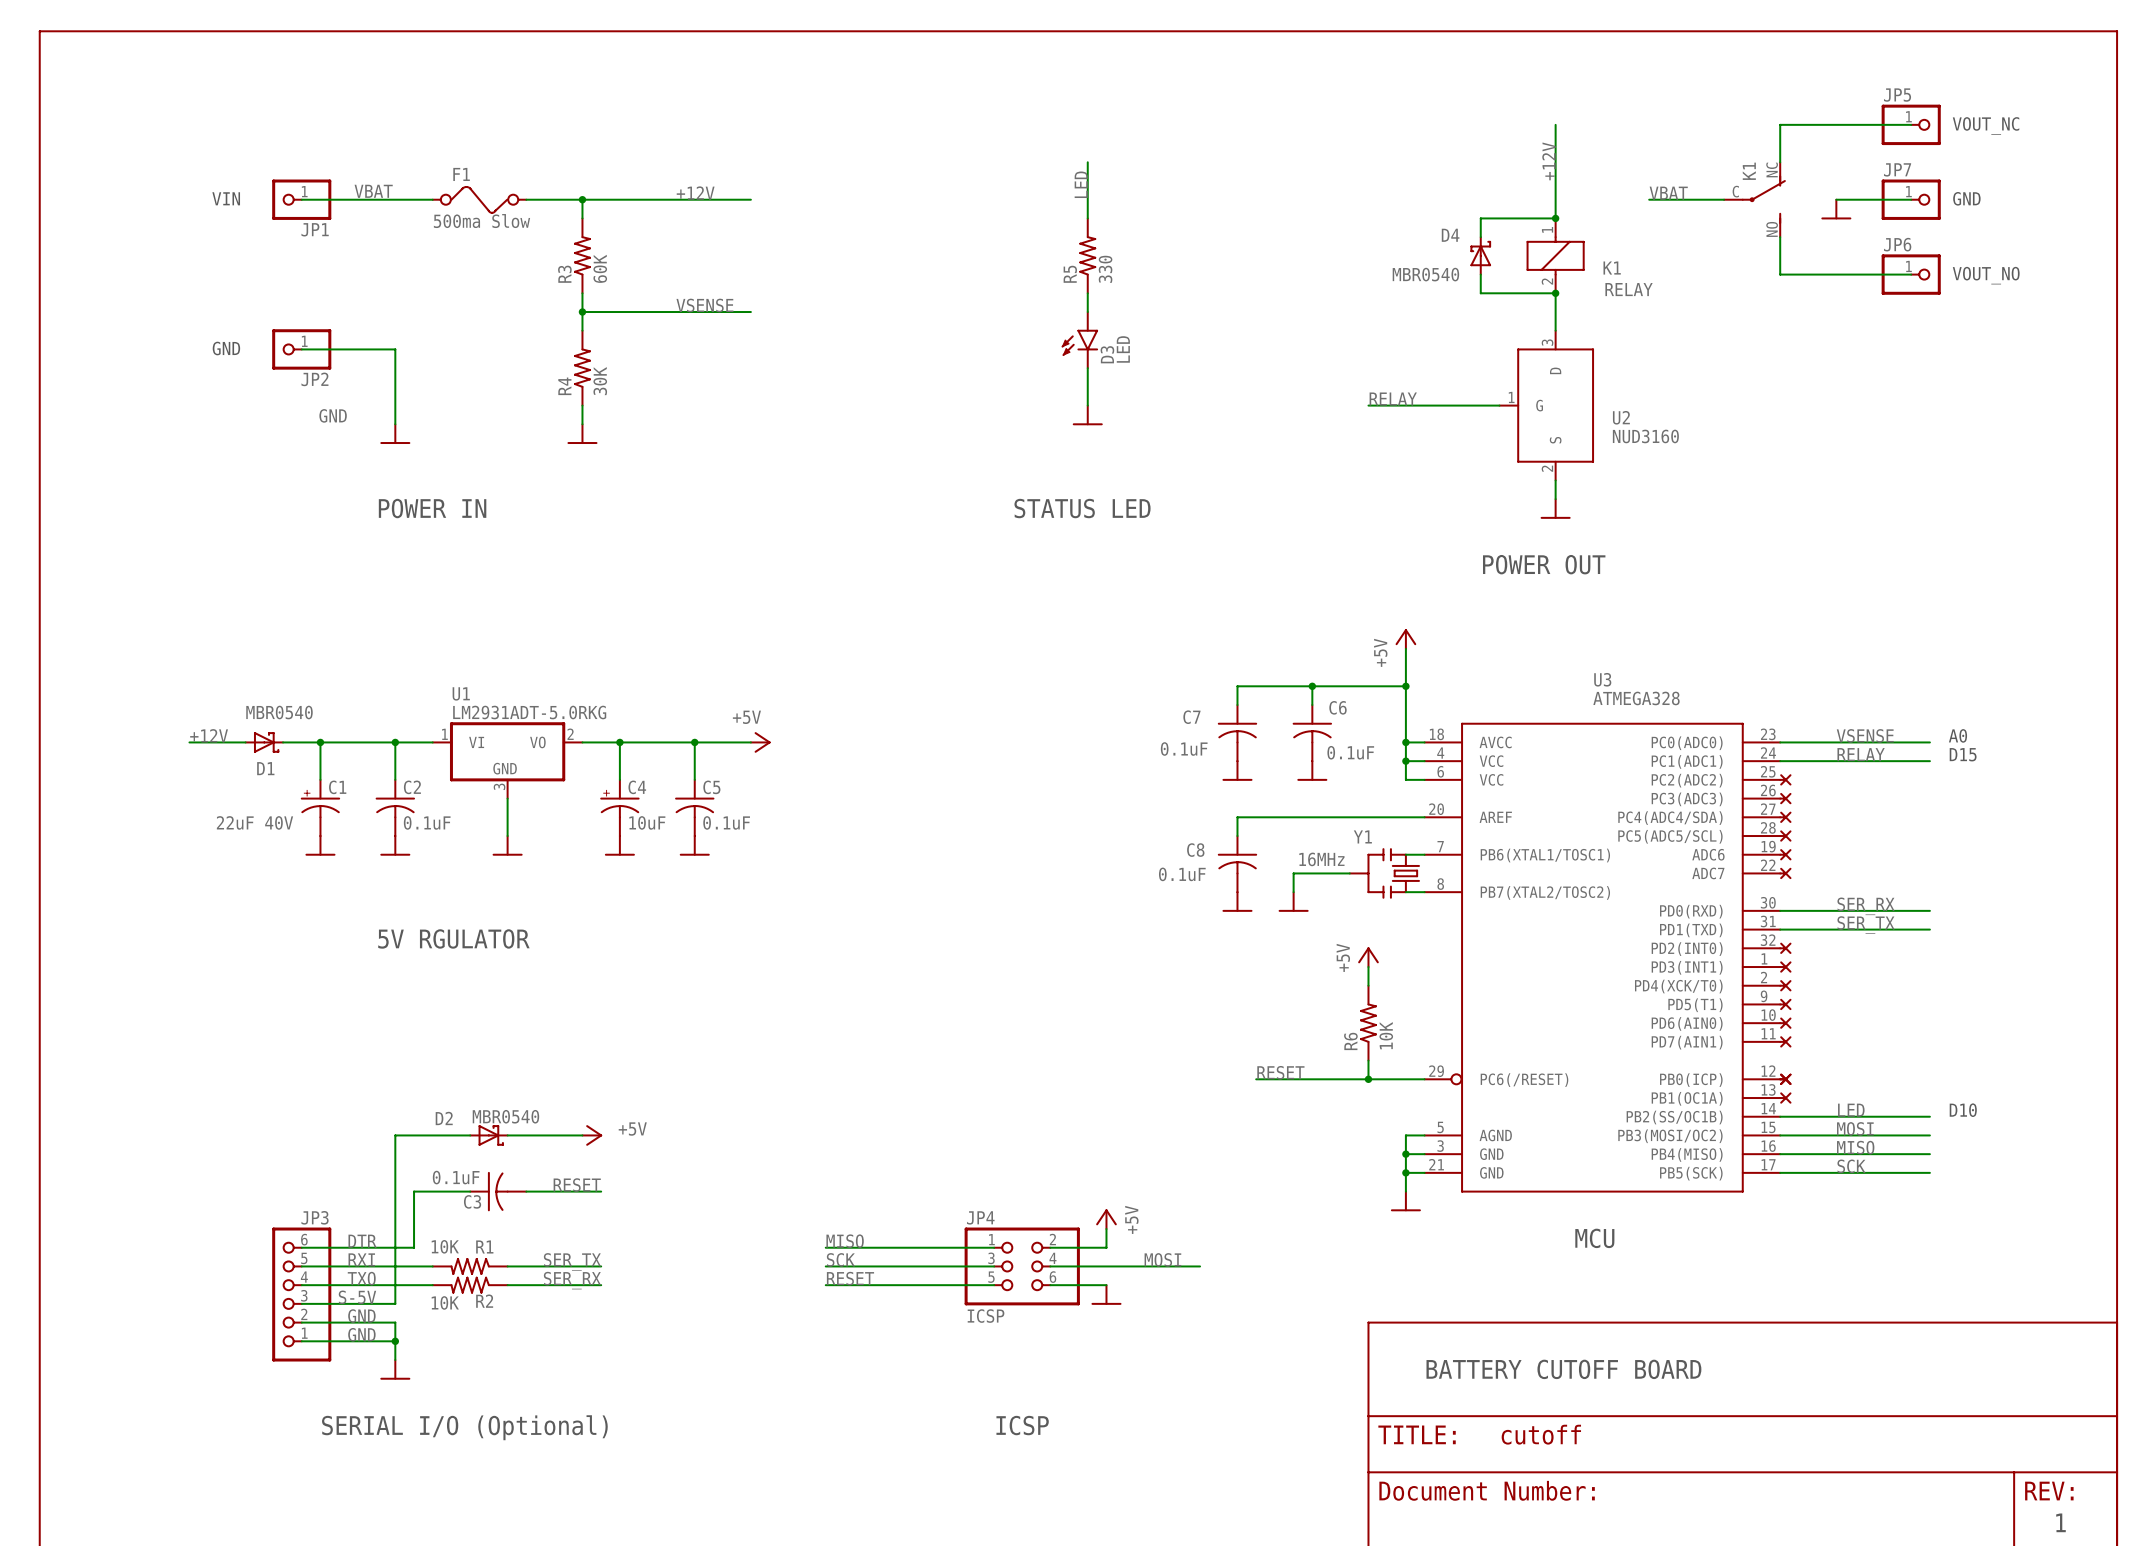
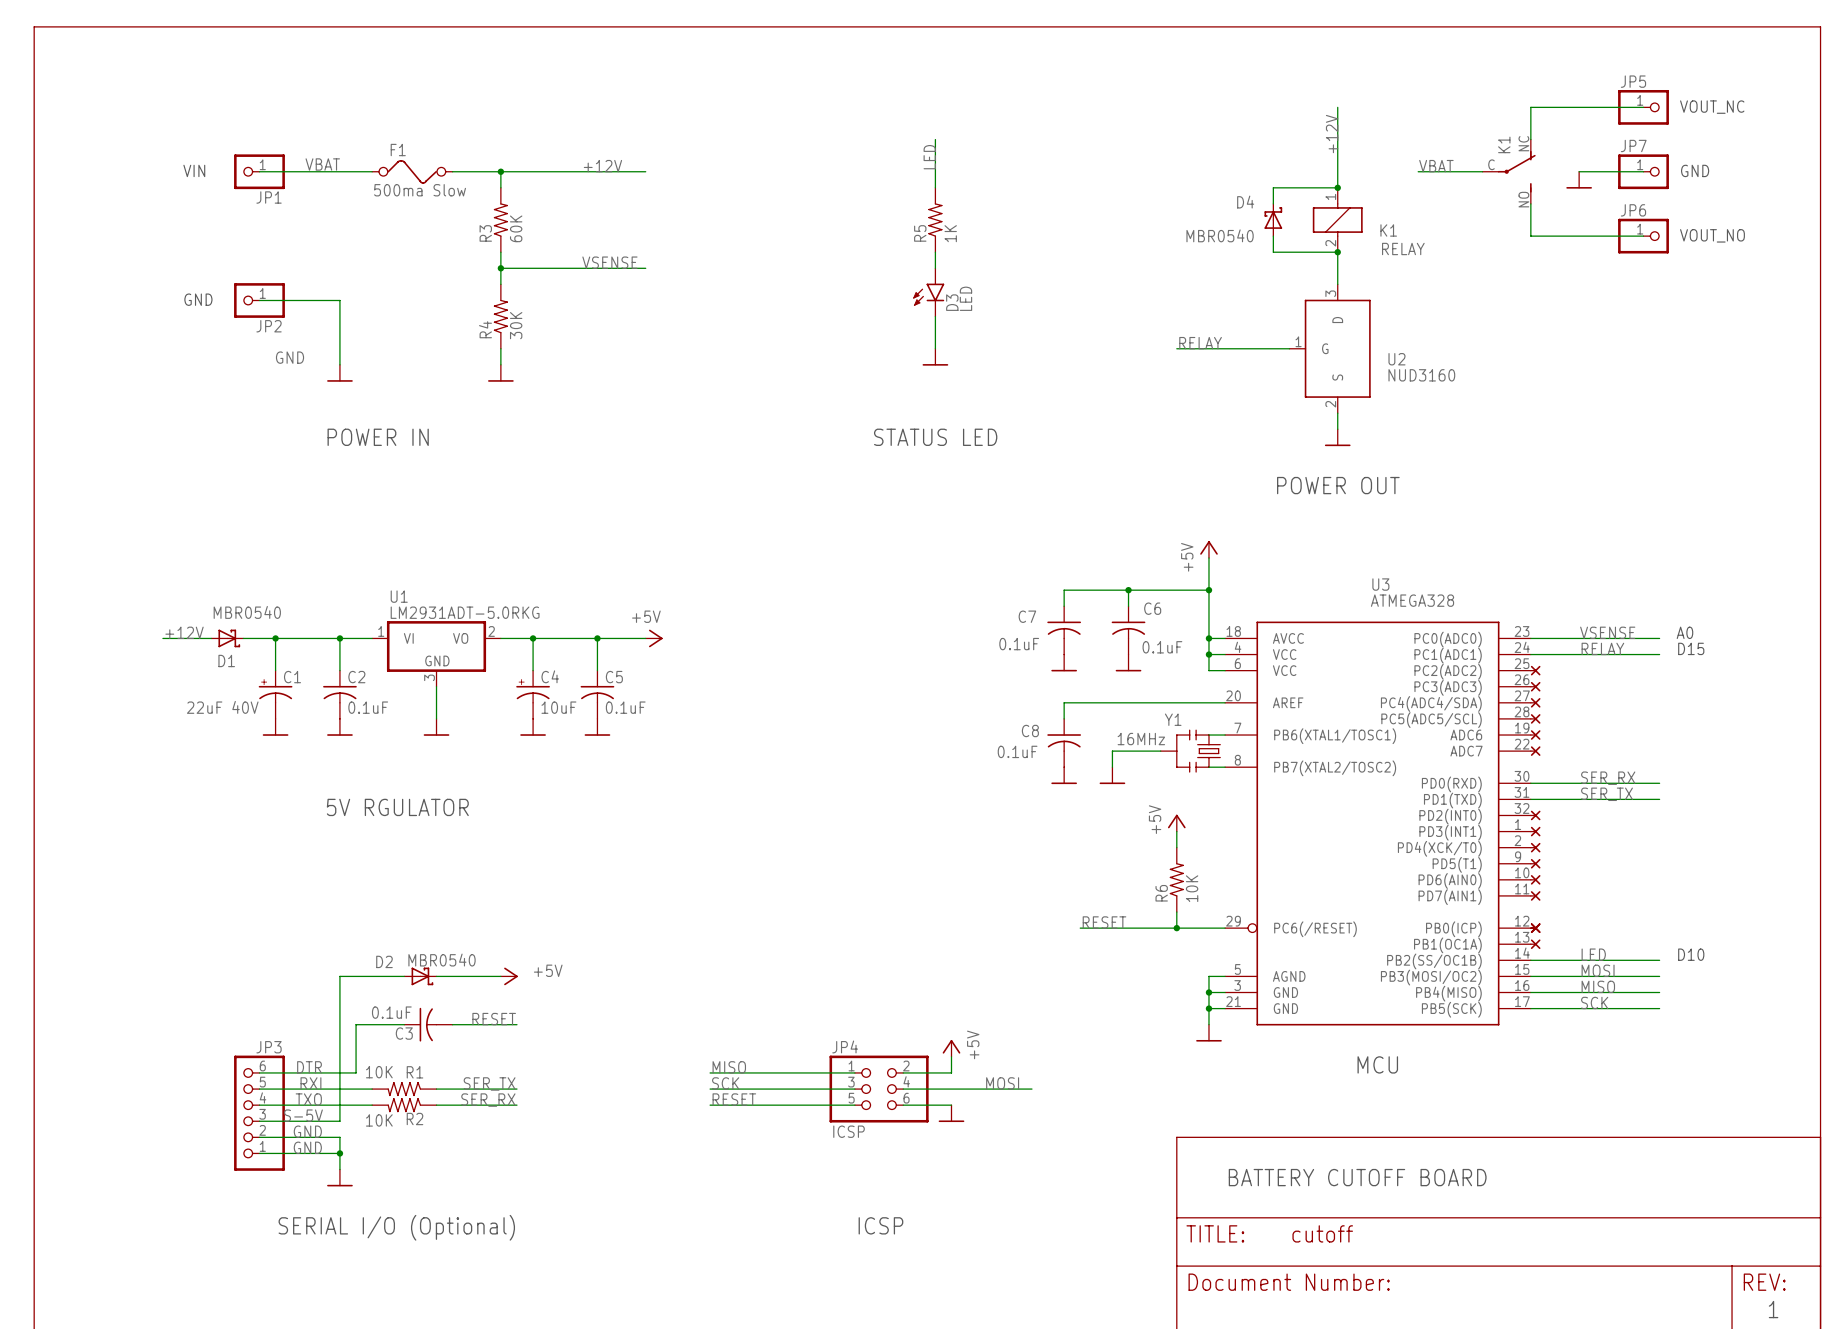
R5 value: 330 (1105, 269) -> 1K (950, 233)

